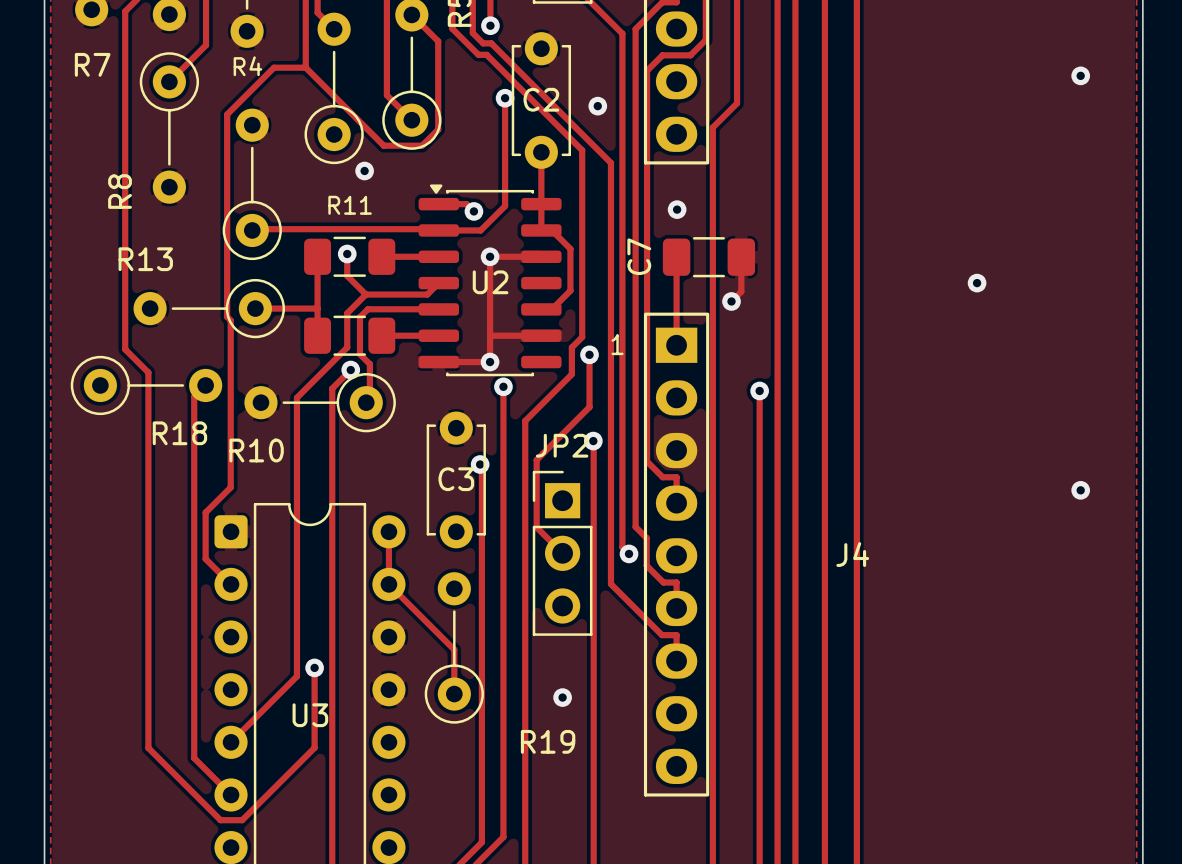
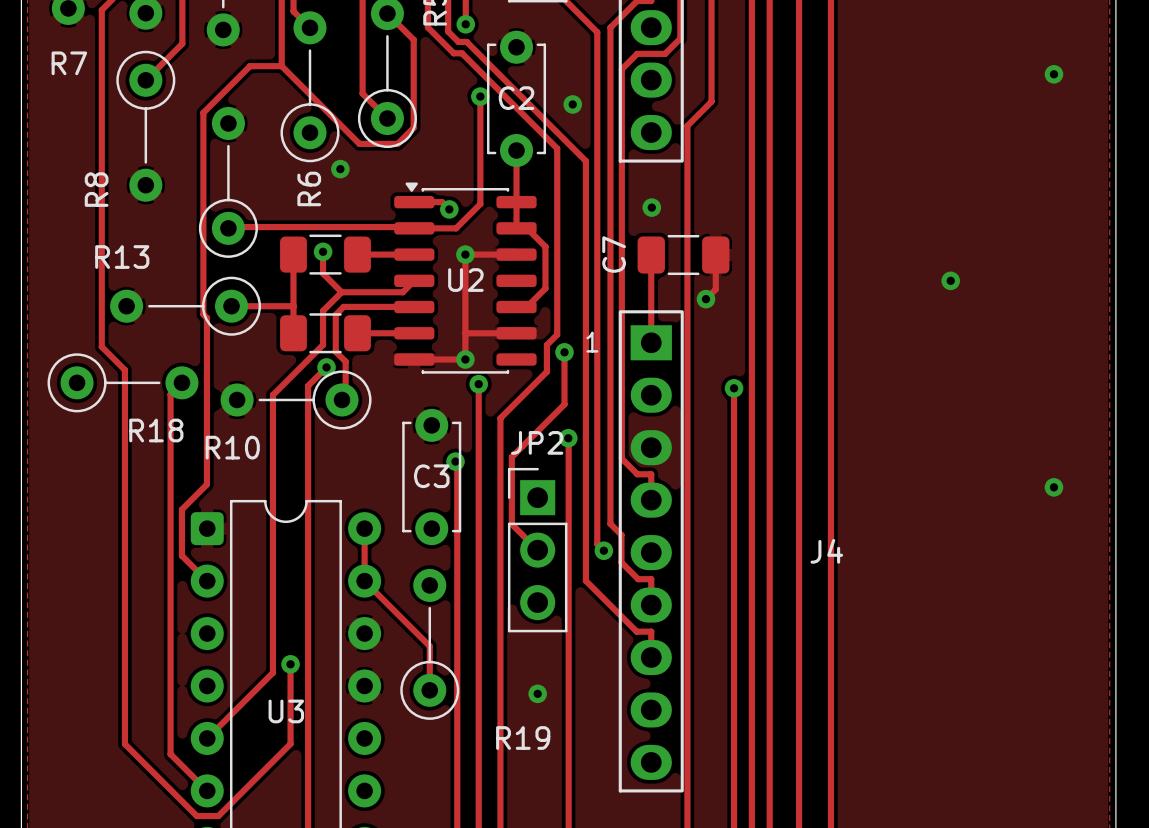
R4 name: R4 (247, 66) -> none
R6 name: none -> R6 (309, 188)
R11 name: R11 (350, 205) -> none

